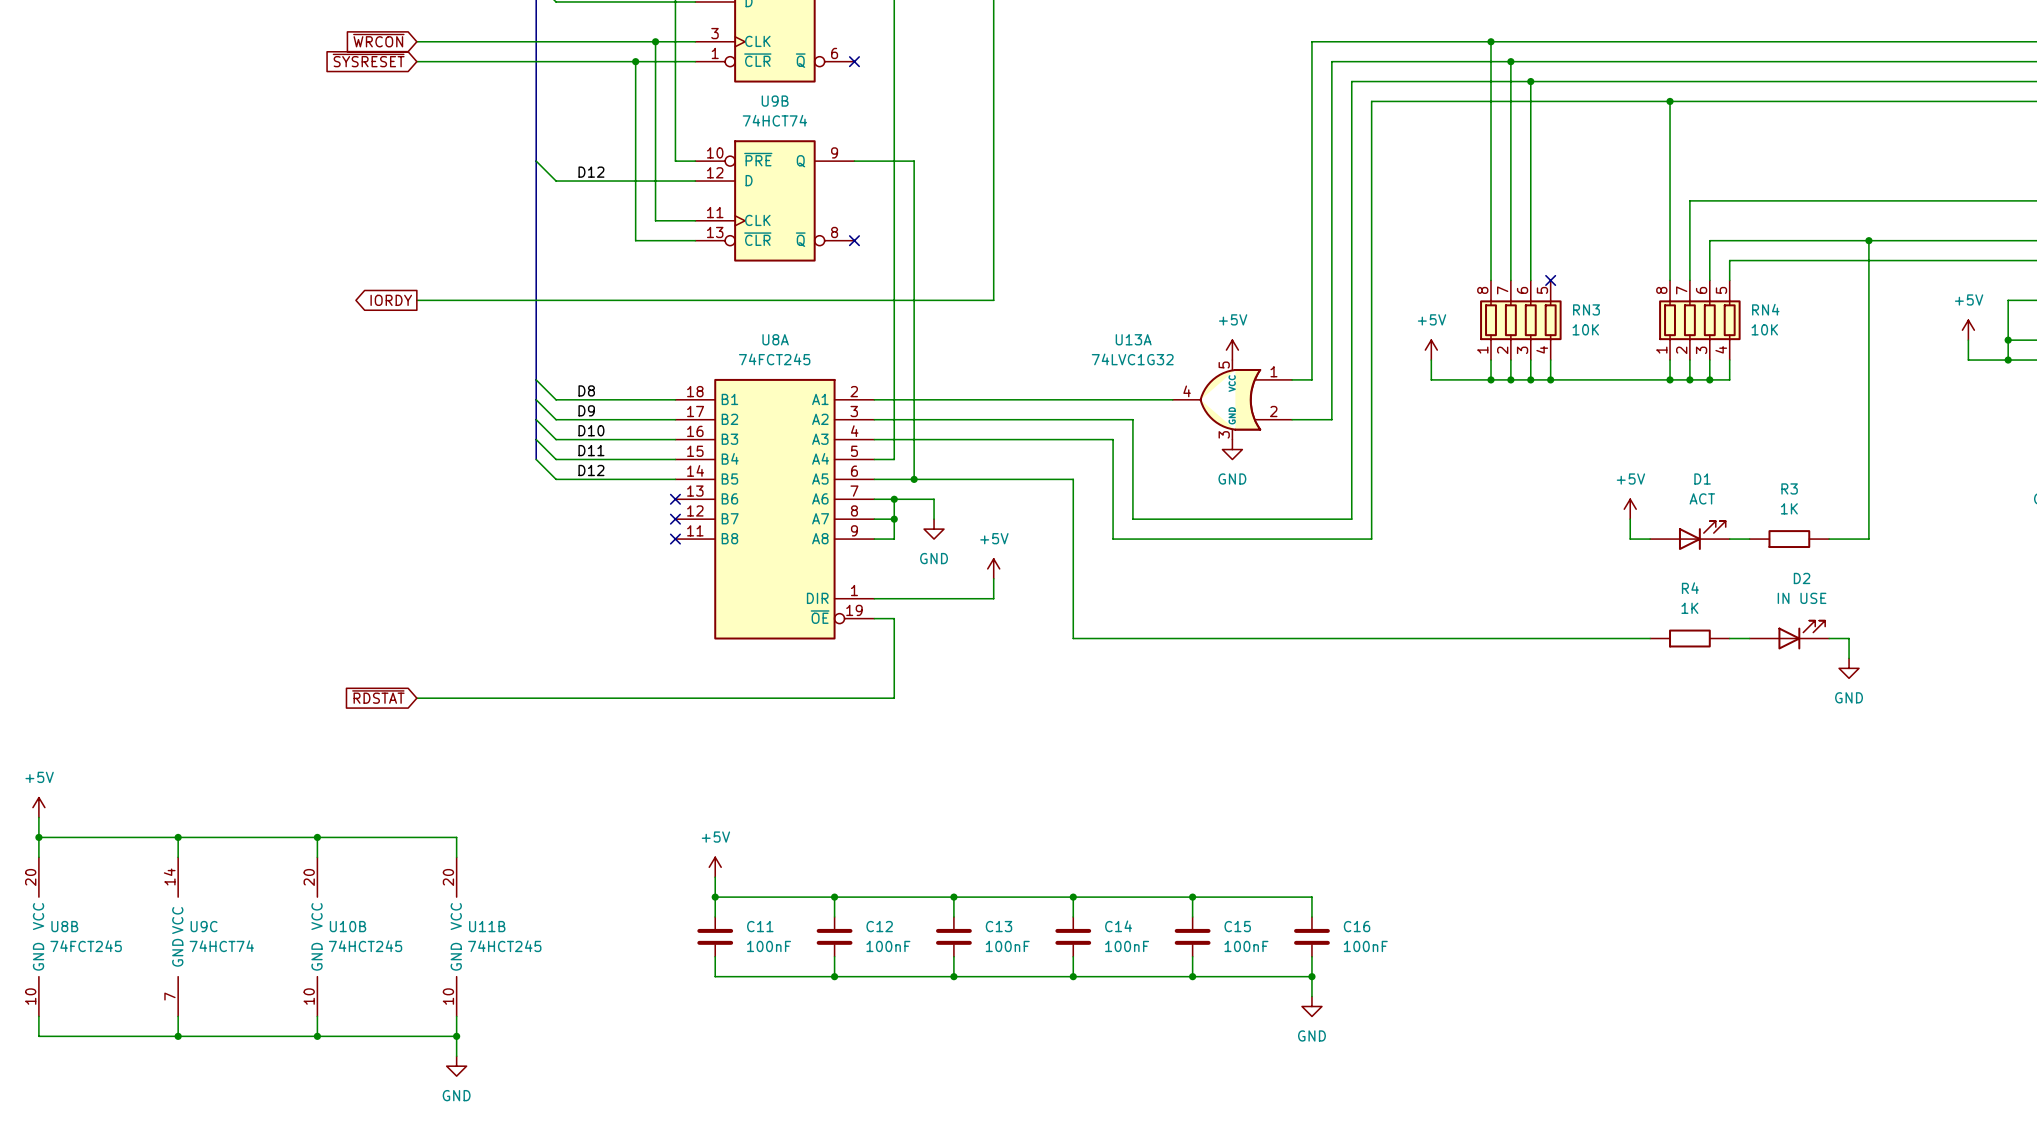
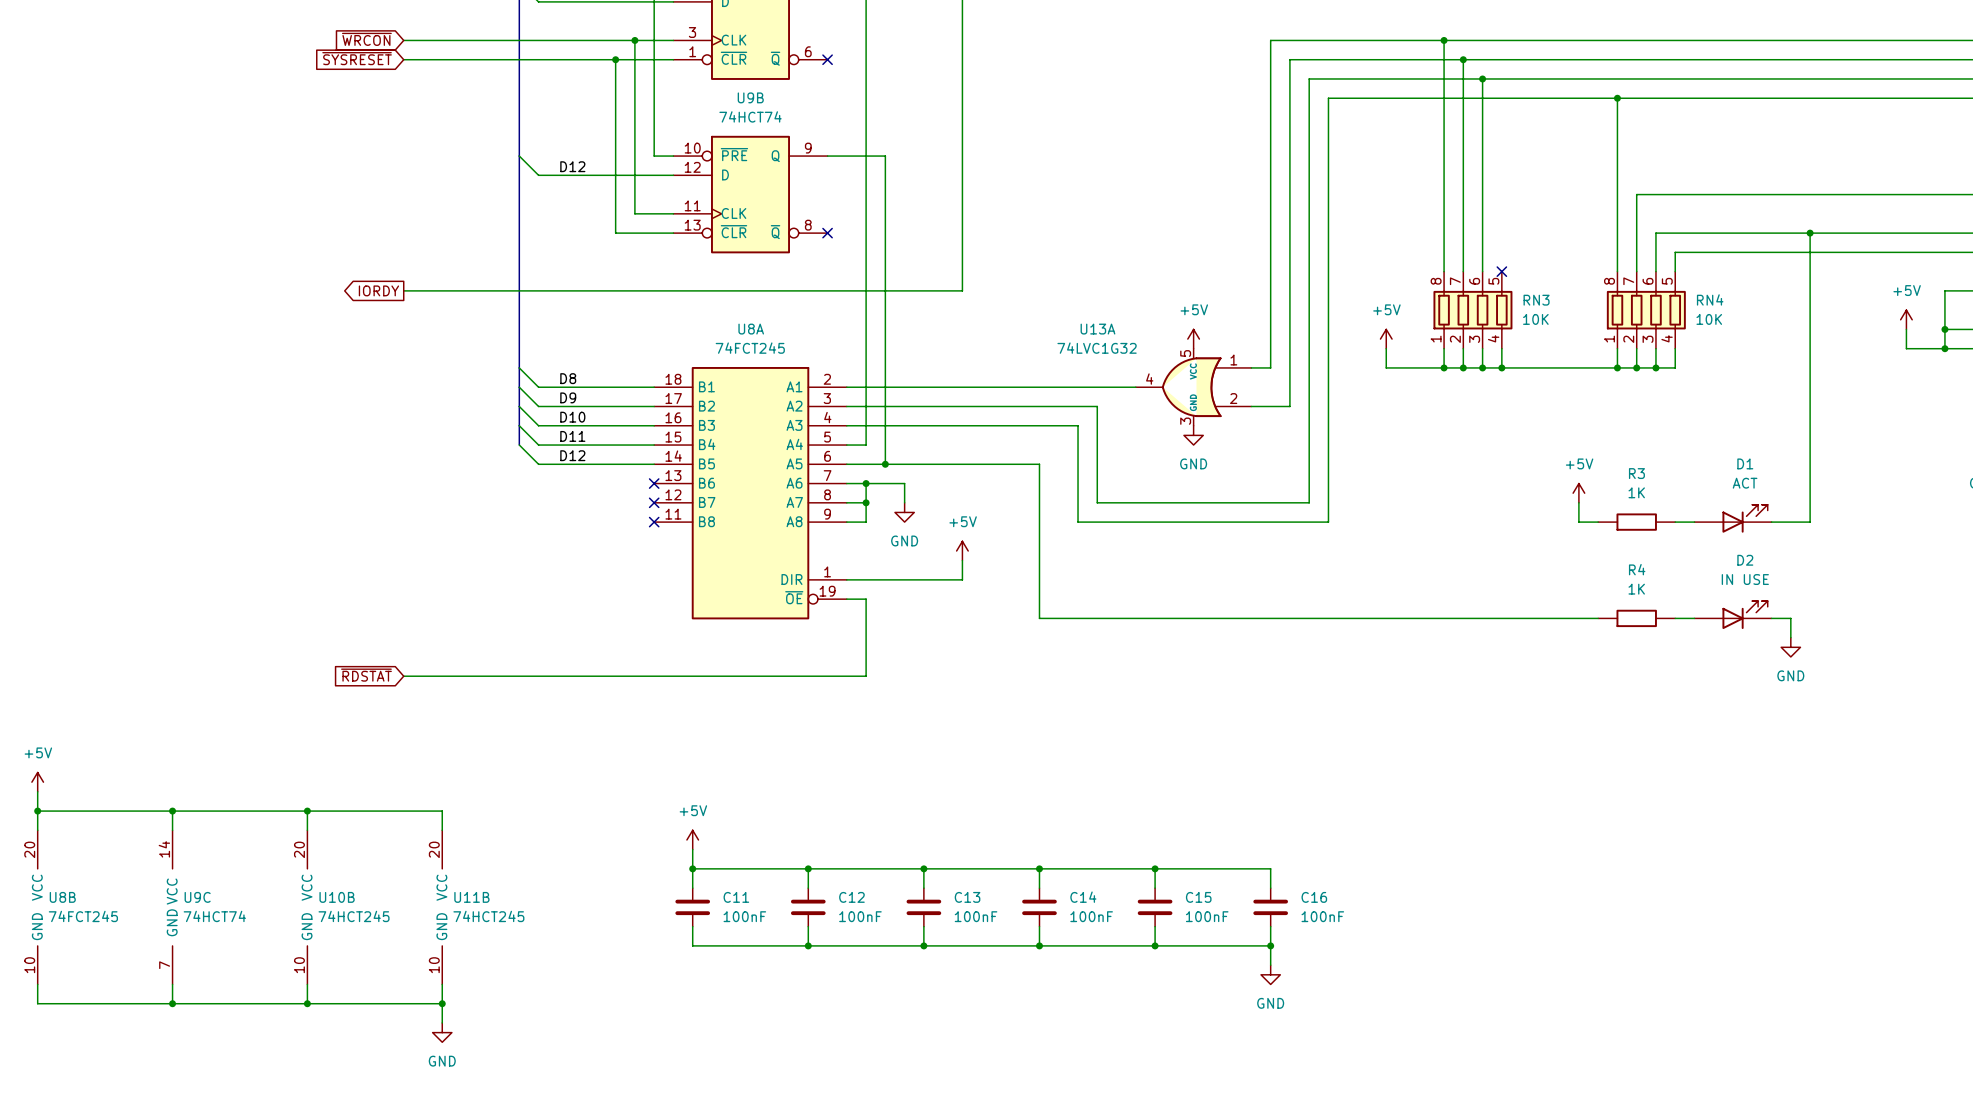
D1 position: (1689, 535) -> (1733, 518)
R3 position: (1789, 539) -> (1636, 522)

